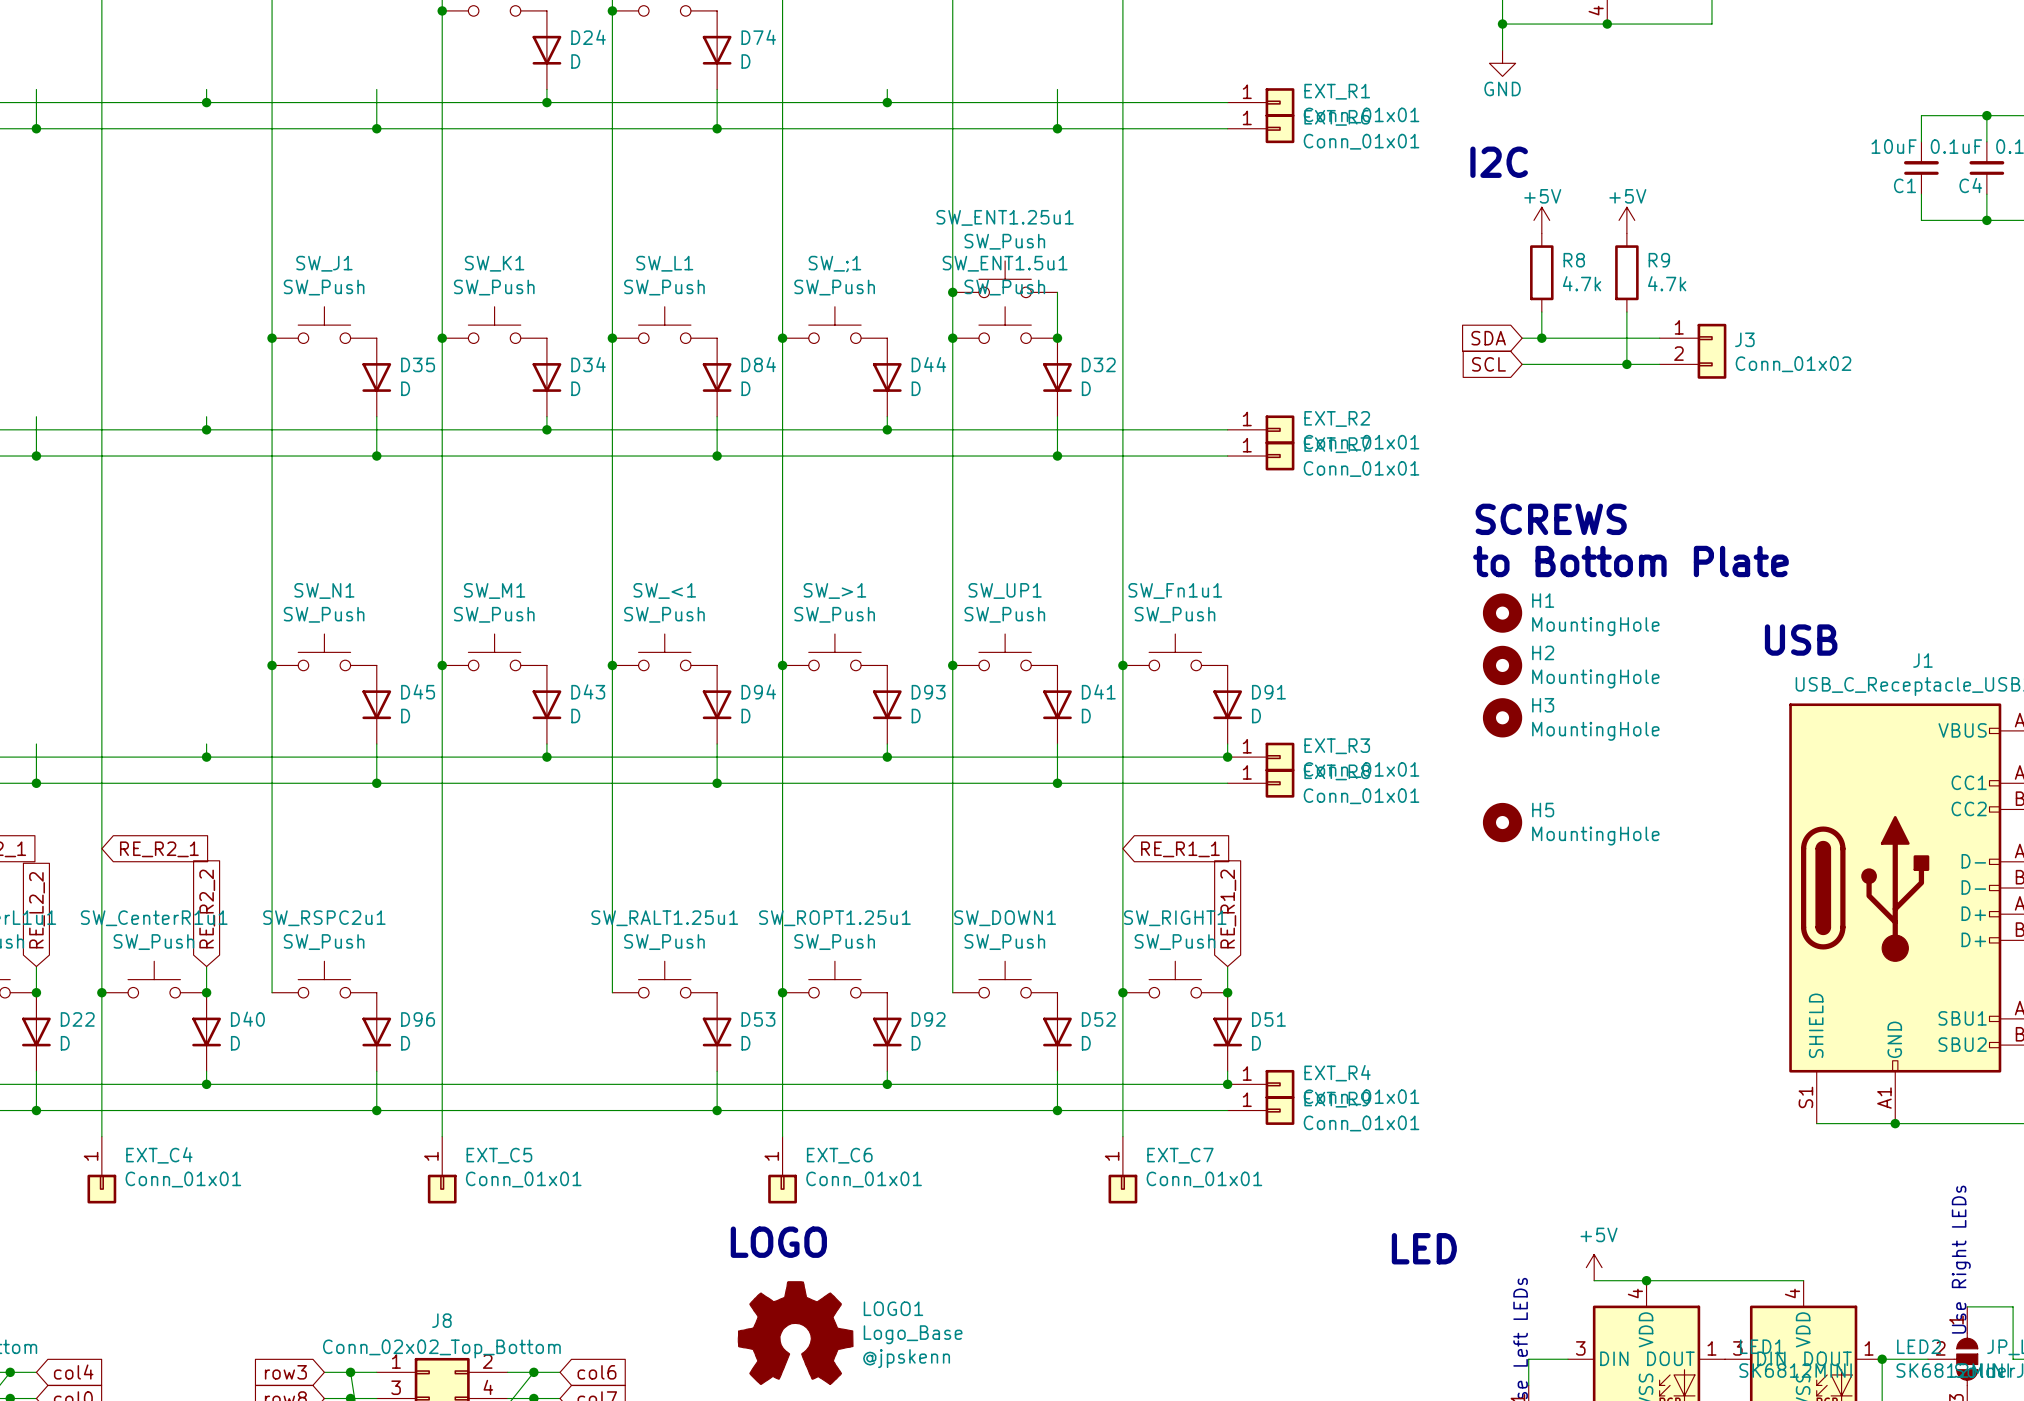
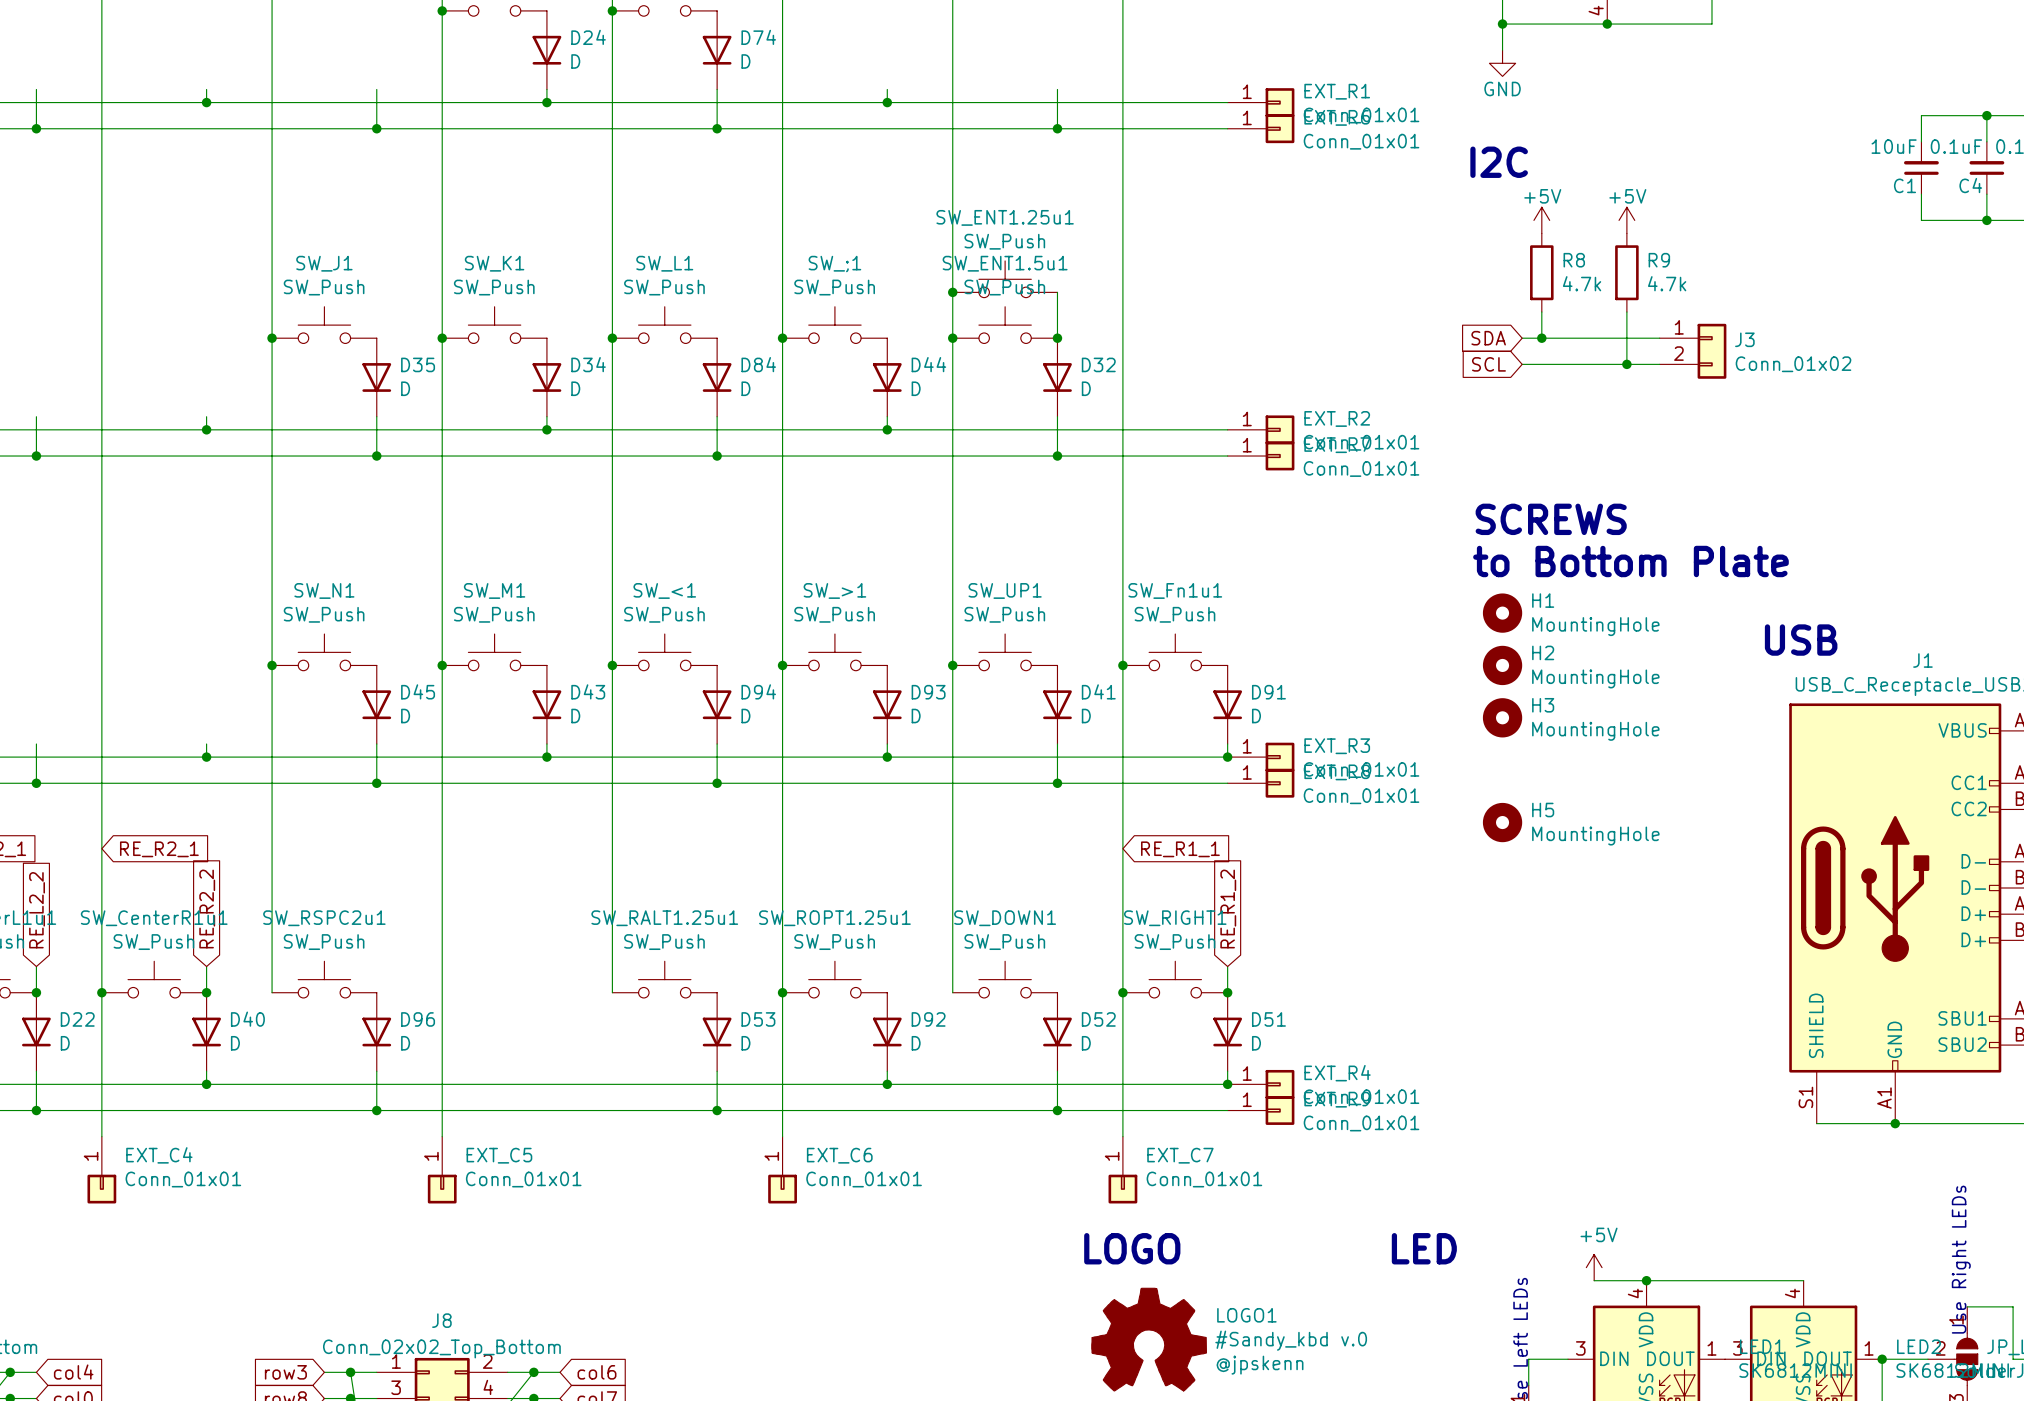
text: LOGO (778, 1242) -> none
text: none -> LOGO (1132, 1248)
LOGO1 position: (795, 1333) -> (1149, 1339)
LOGO1 value: Logo_Base (913, 1334) -> #Sandy_kbd v.0 (1291, 1340)

